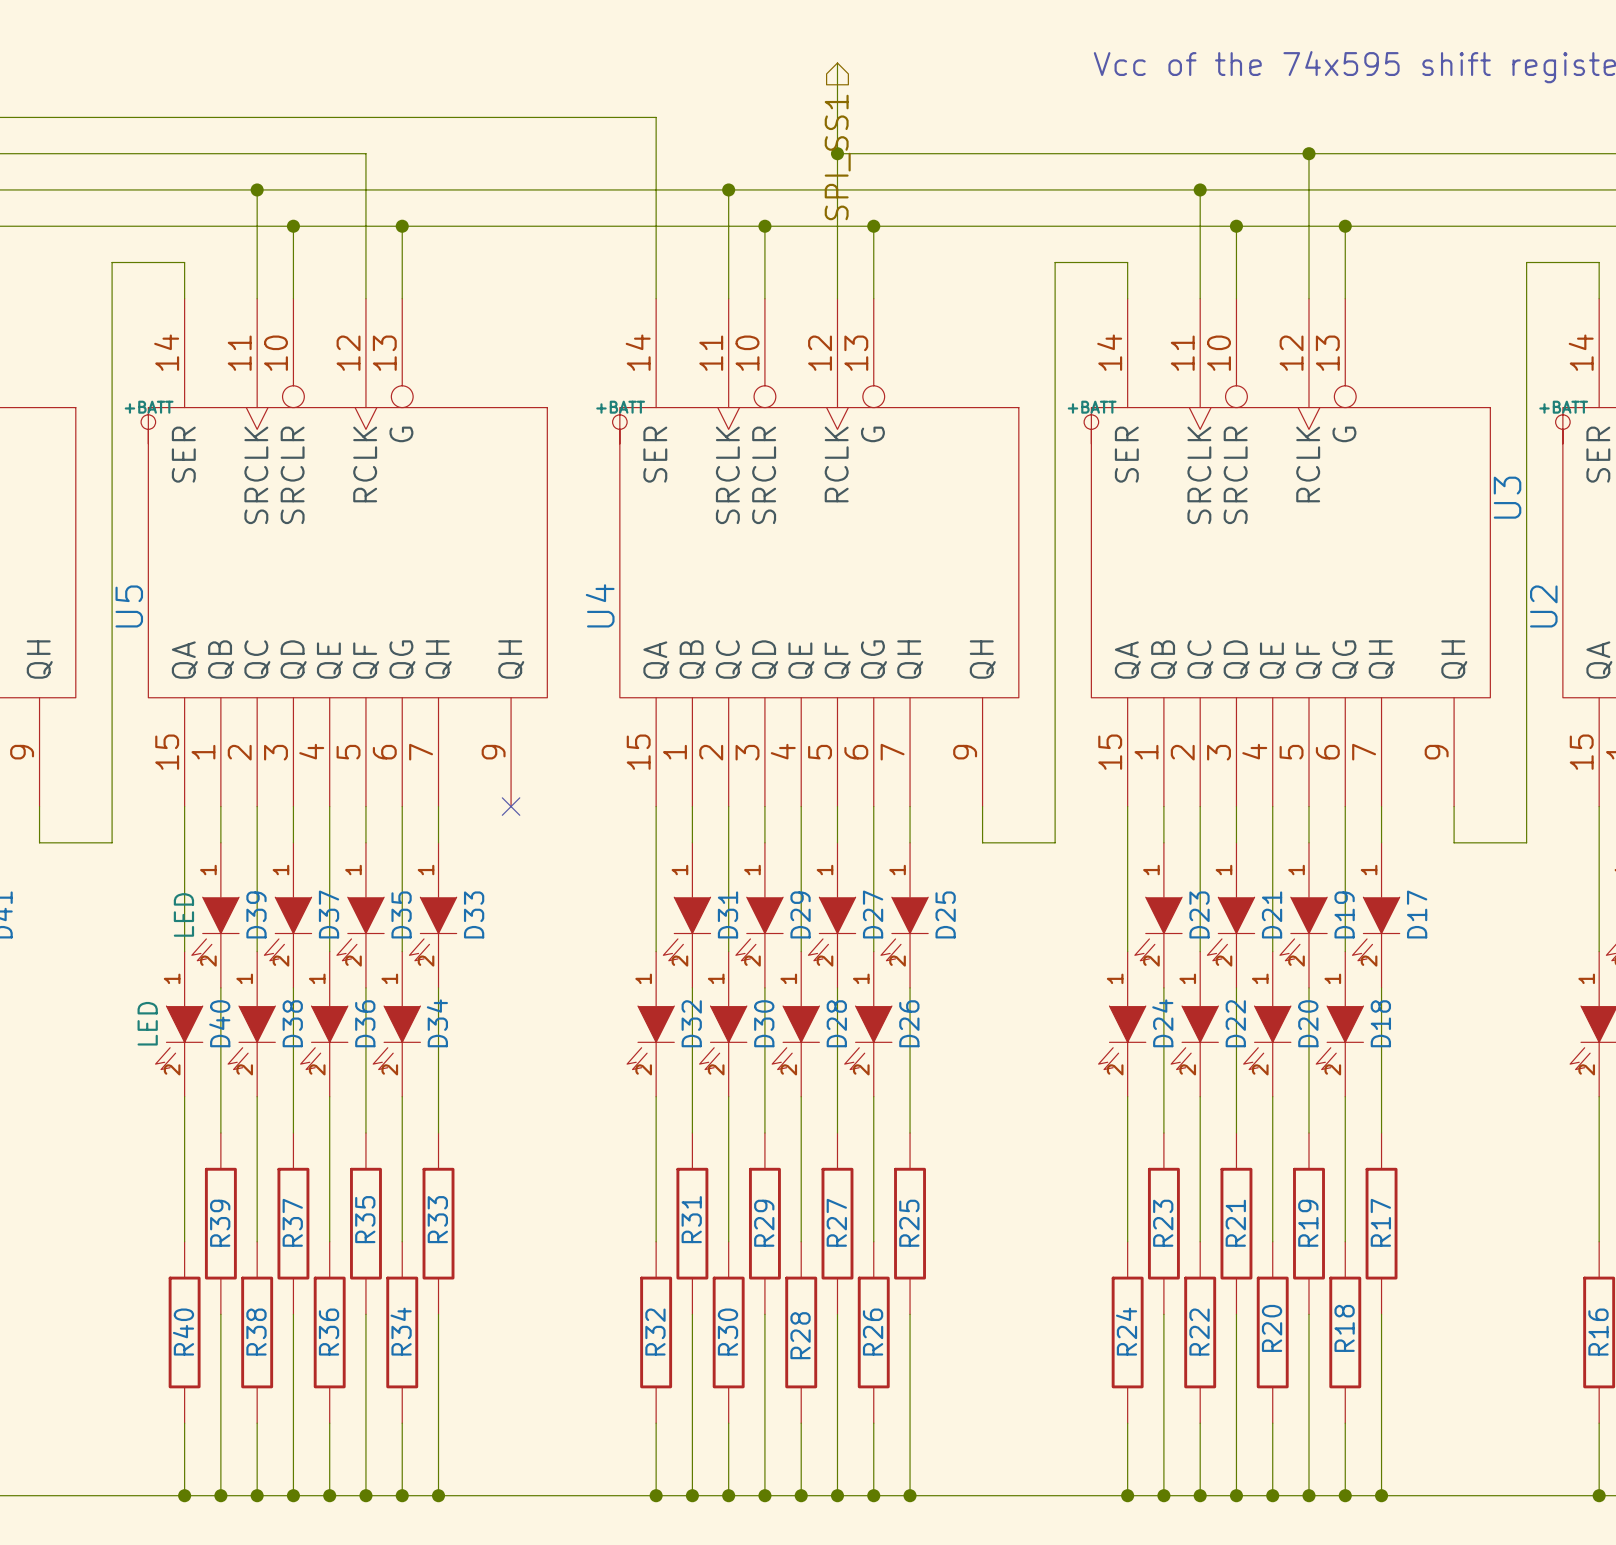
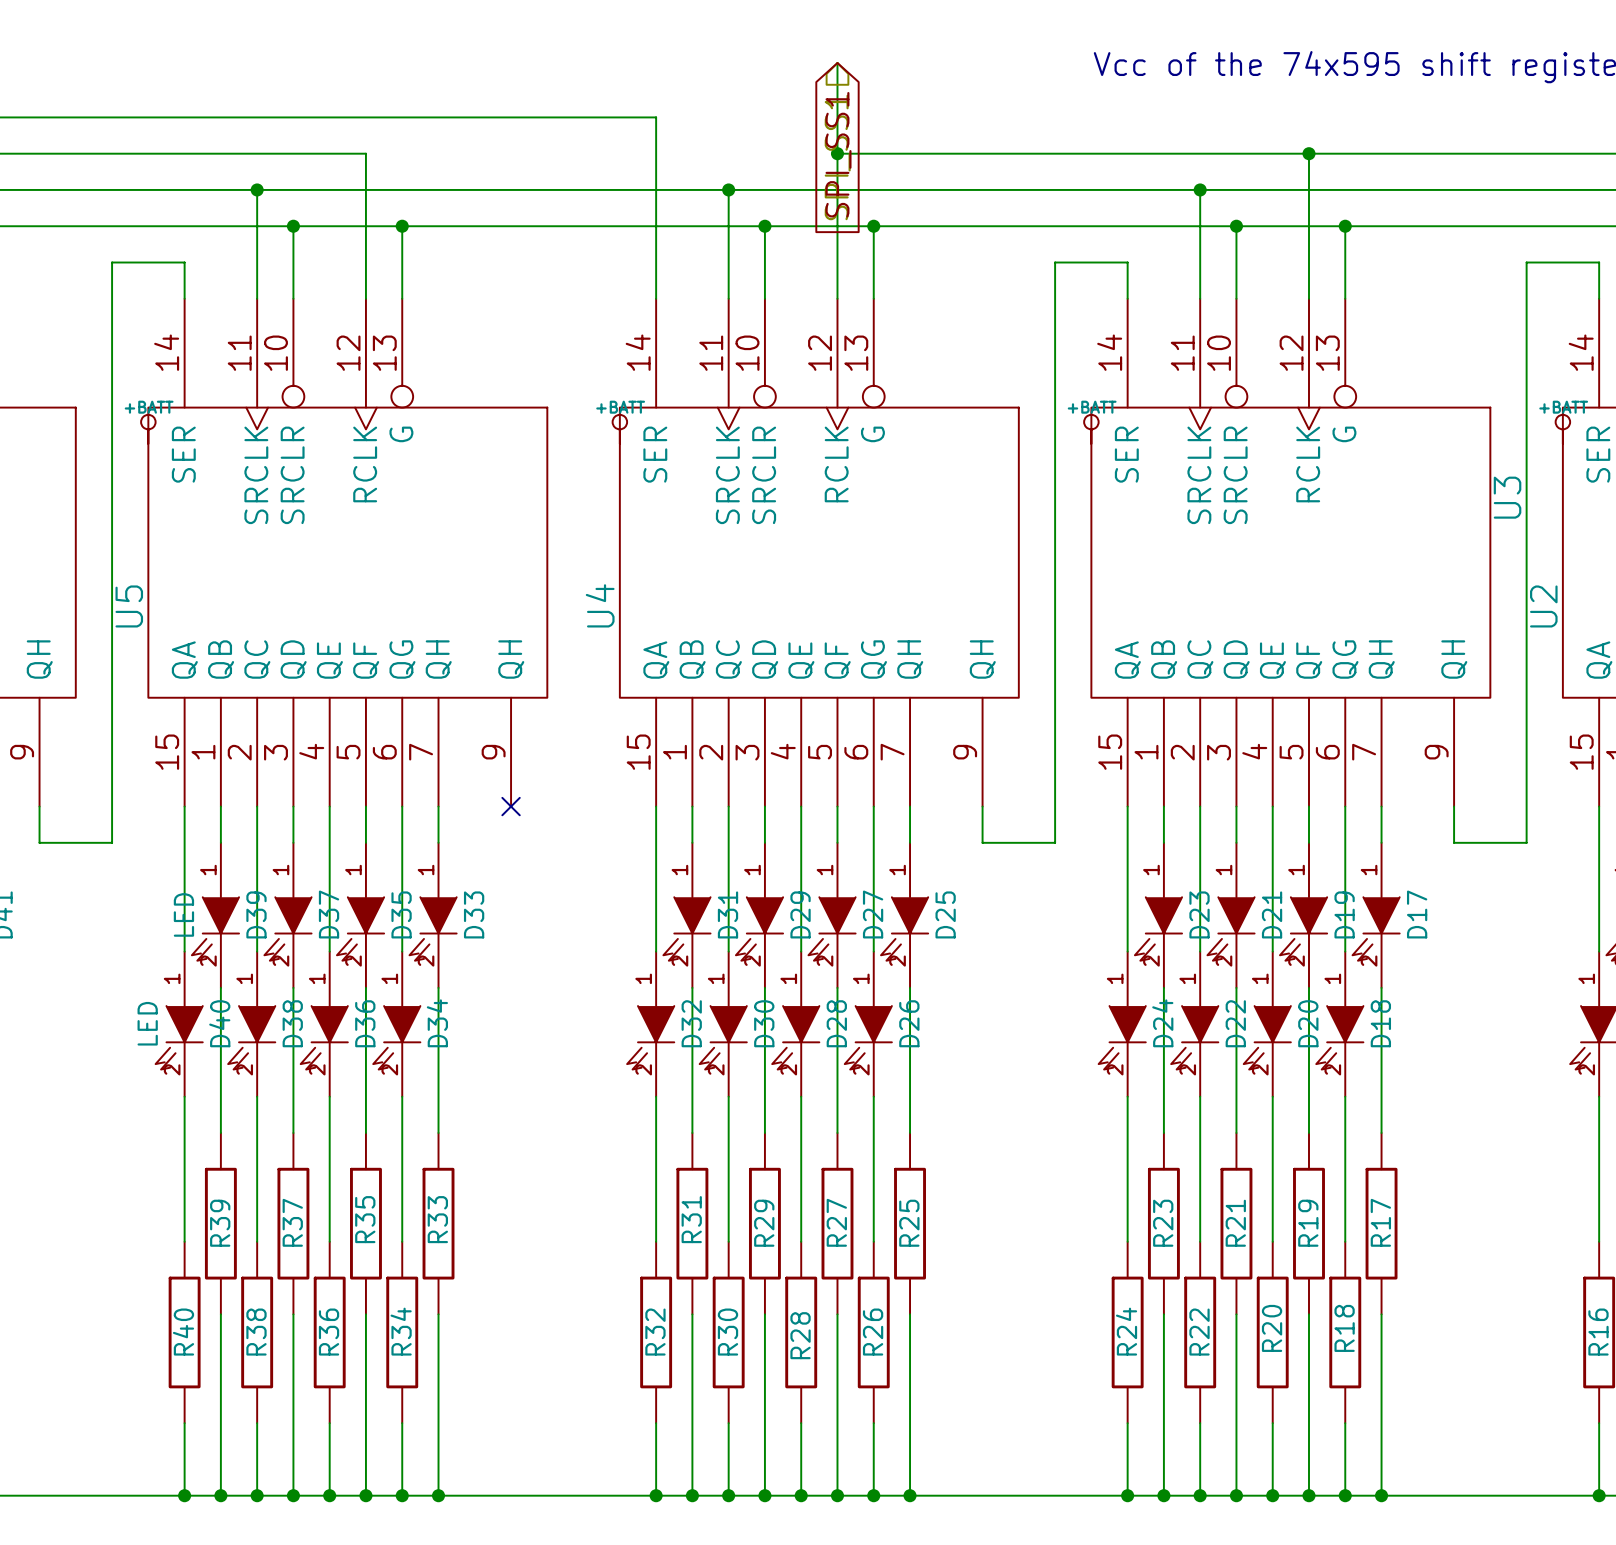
global label: none -> SPI_SS1 (838, 154)

